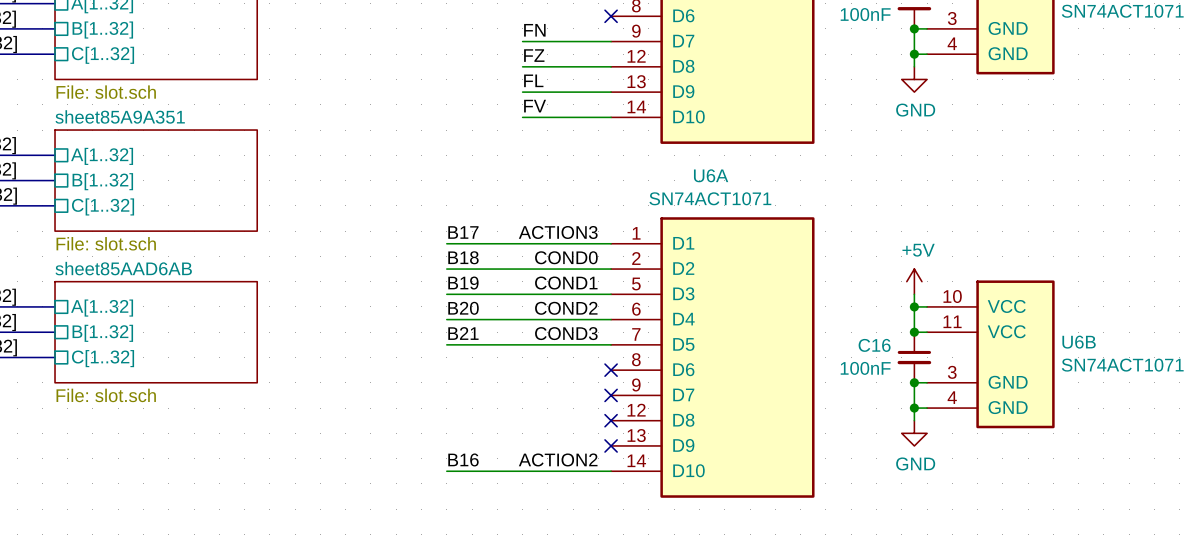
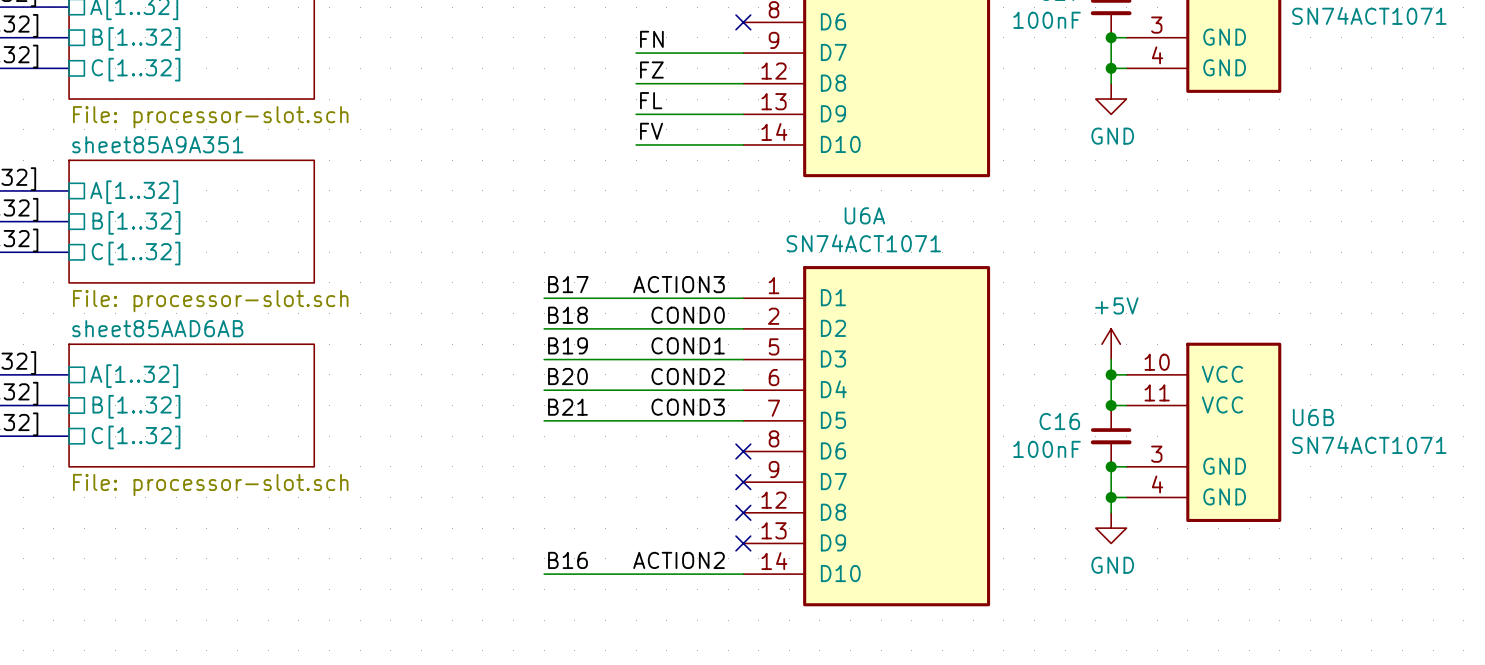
sheet value: File: slot.sch (106, 92) -> File: processor-slot.sch (210, 117)
sheet sheet85A9A351 value: File: slot.sch (106, 243) -> File: processor-slot.sch (210, 301)
sheet sheet85AAD6AB value: File: slot.sch (106, 395) -> File: processor-slot.sch (210, 485)

